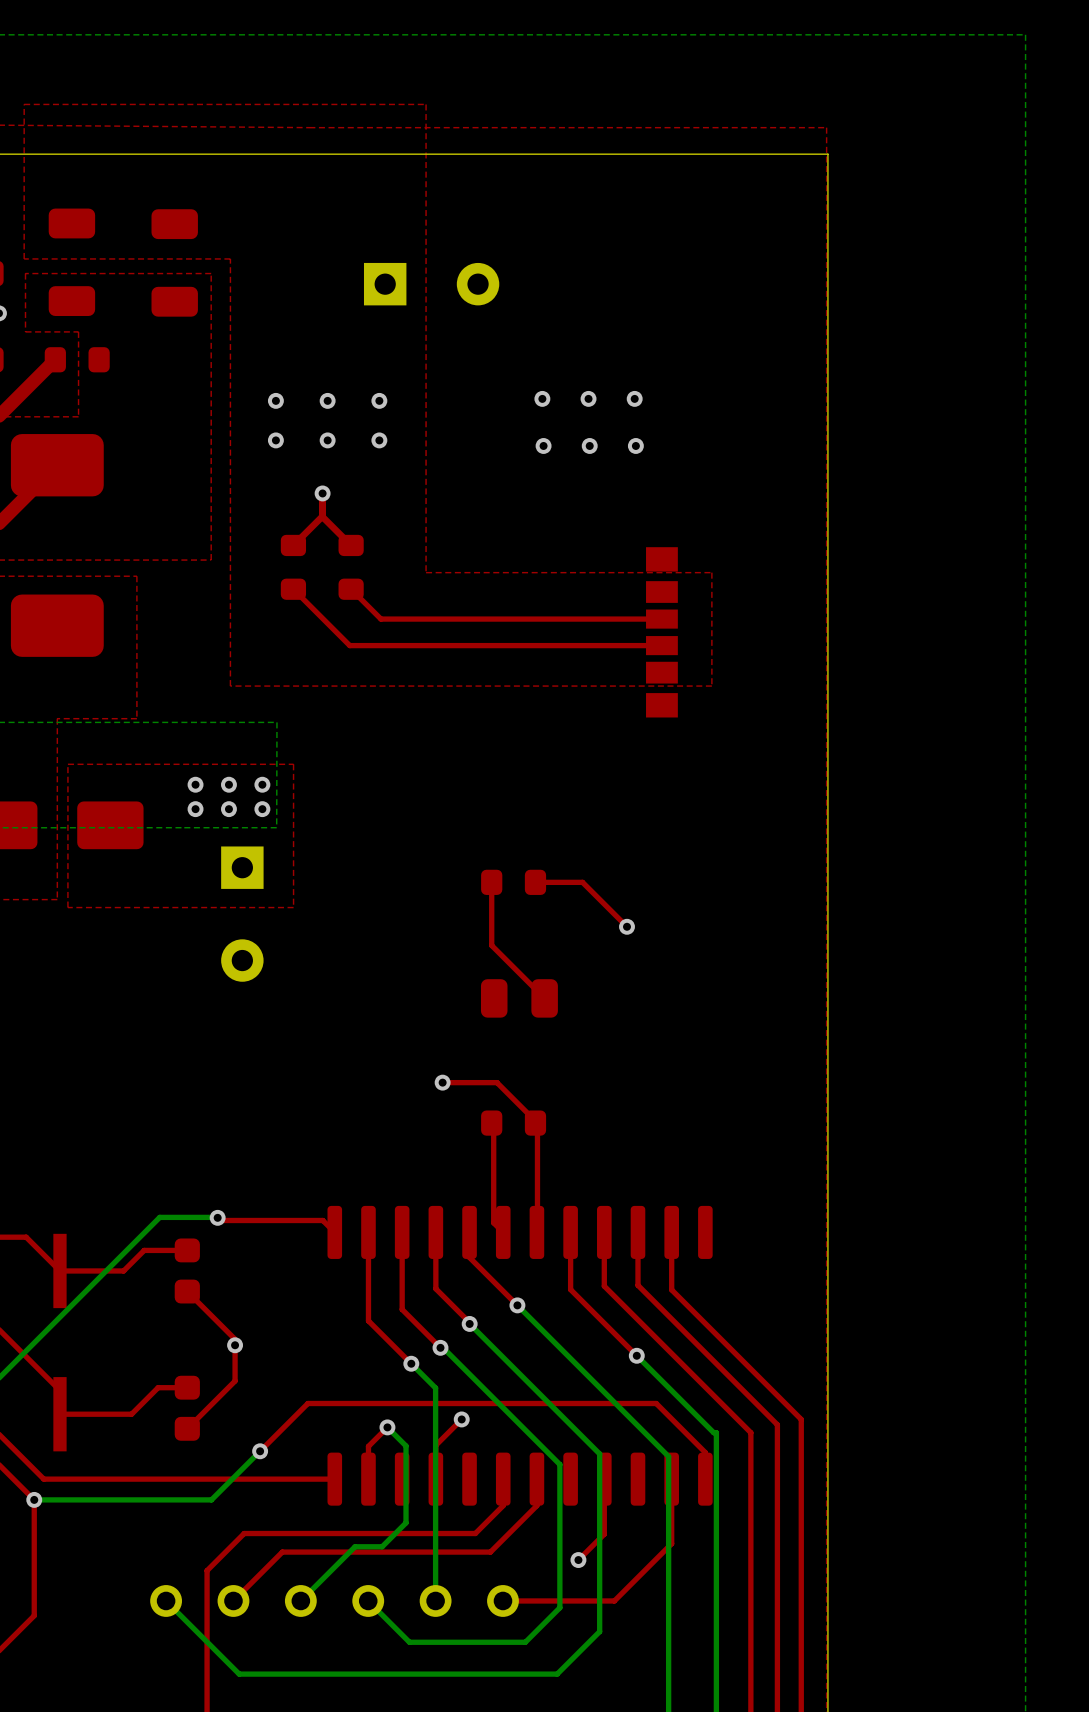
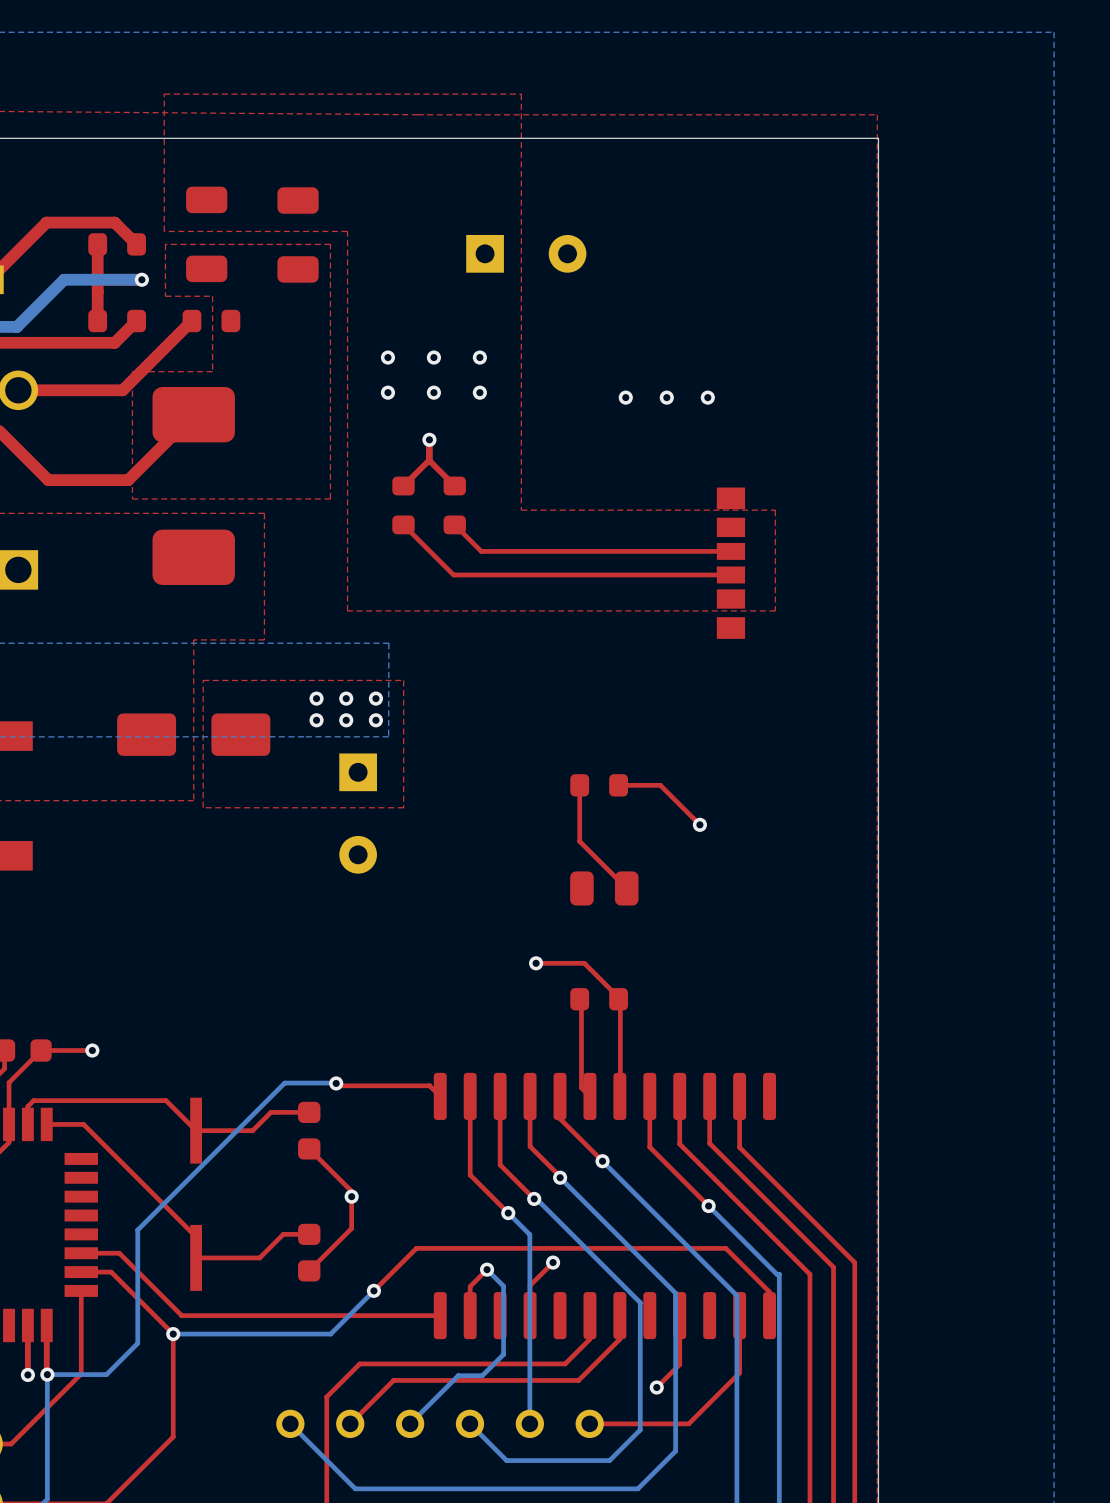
via: (542, 398) -> none
via: (588, 398) -> none
via: (634, 398) -> none

